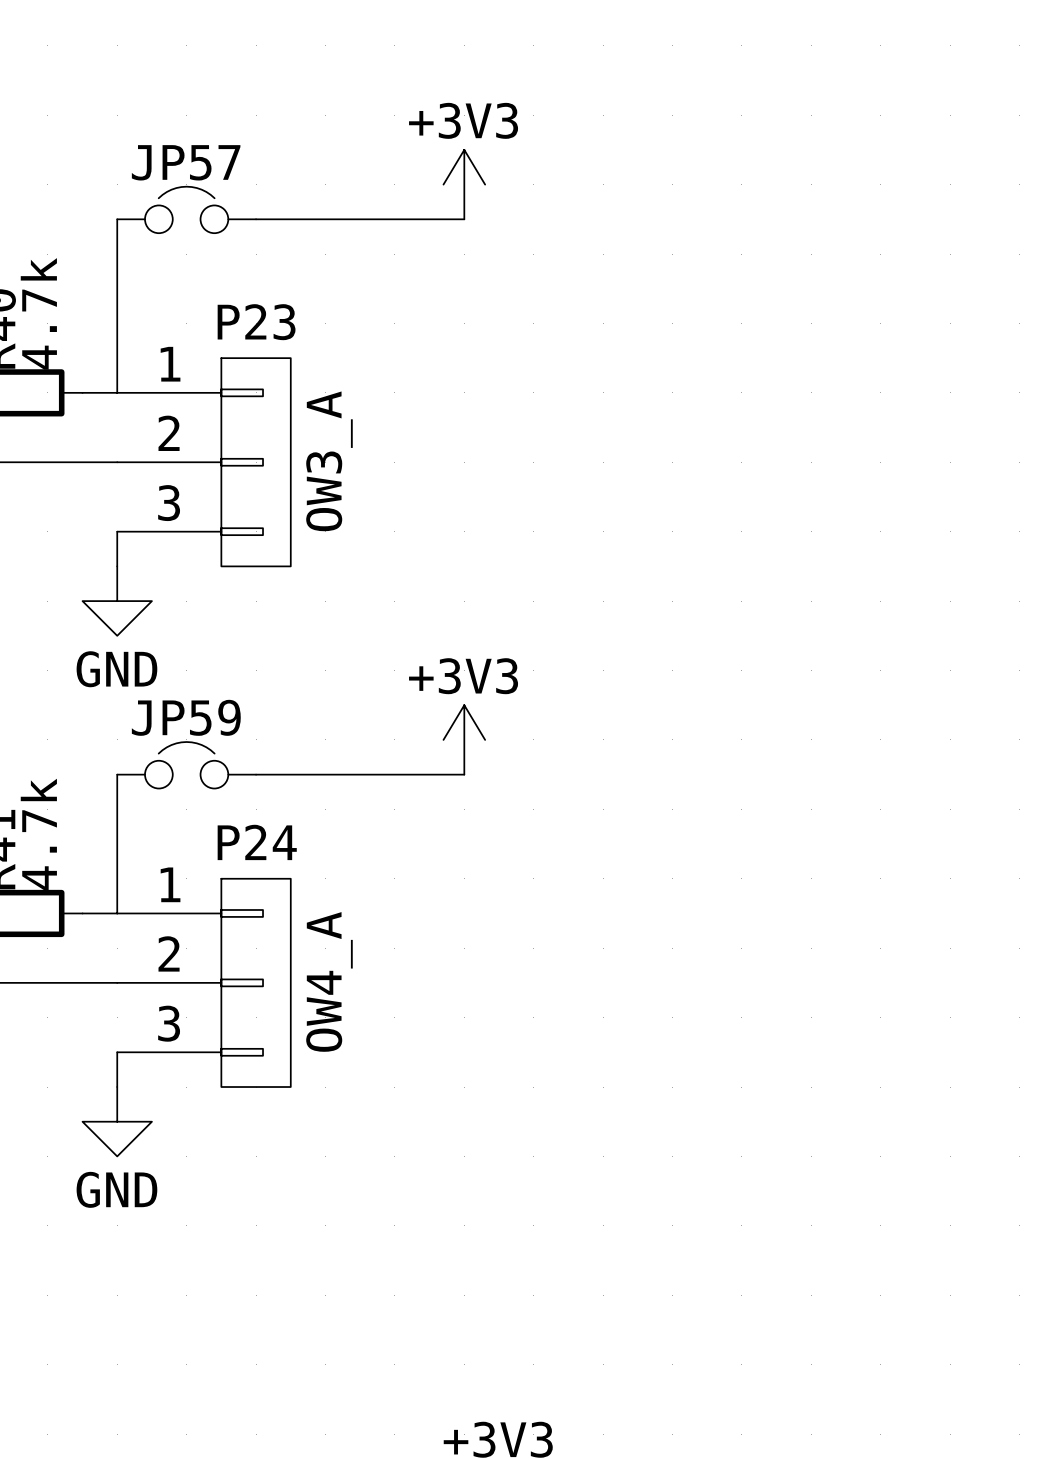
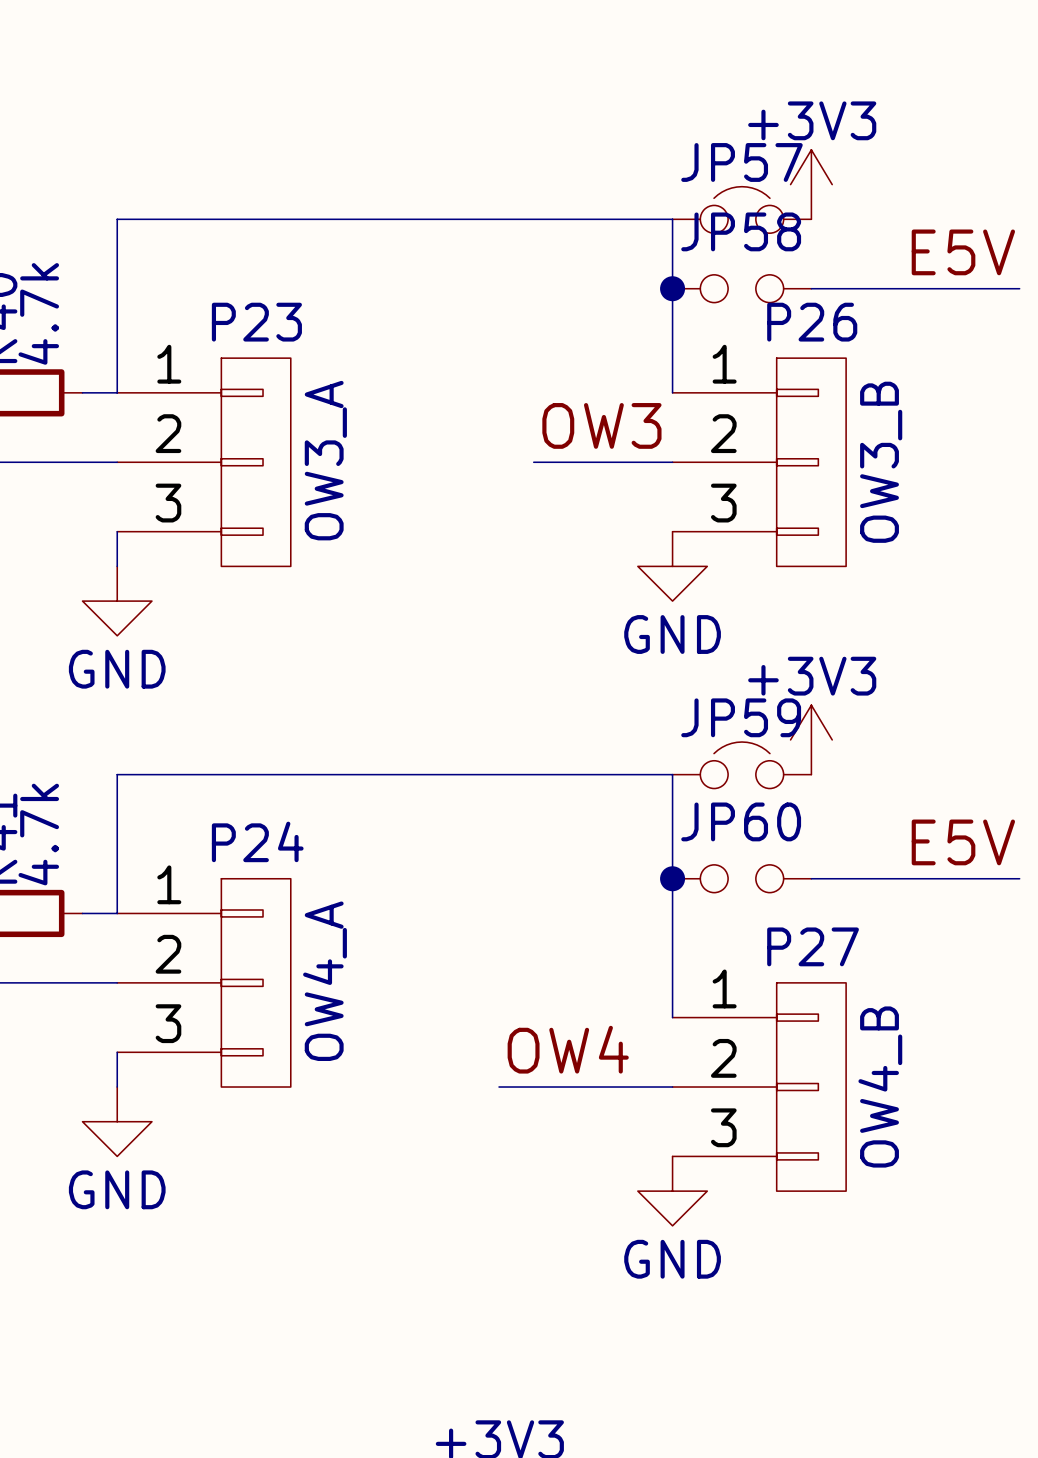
power symbol: +3V3 (464, 184) -> none
power symbol: none -> +3V3 (811, 184)
JP57 position: (186, 209) -> (741, 209)
wire: none -> (117, 219) (256, 219)
wire: none -> (464, 219) (672, 219) (672, 392)
label: none -> E5V (963, 252)
junction: none -> (672, 288)
JP58: none -> (741, 288)
wire: none -> (811, 288) (1019, 288)
label: none -> OW3 (601, 425)
wire: none -> (533, 462) (672, 462)
P26: none -> OW3_B (759, 462)
power symbol: none -> GND (672, 566)
power symbol: +3V3 (464, 739) -> none
power symbol: none -> +3V3 (811, 739)
JP59 position: (186, 765) -> (741, 765)
wire: none -> (117, 774) (256, 774)
wire: none -> (464, 774) (672, 774) (672, 1017)
label: none -> E5V (963, 842)
junction: none -> (672, 878)
JP60: none -> (741, 878)
wire: none -> (811, 878) (1019, 878)
label: none -> OW4 (568, 1049)
wire: none -> (499, 1087) (672, 1087)
P27: none -> OW4_B (759, 1087)
power symbol: none -> GND (672, 1191)

